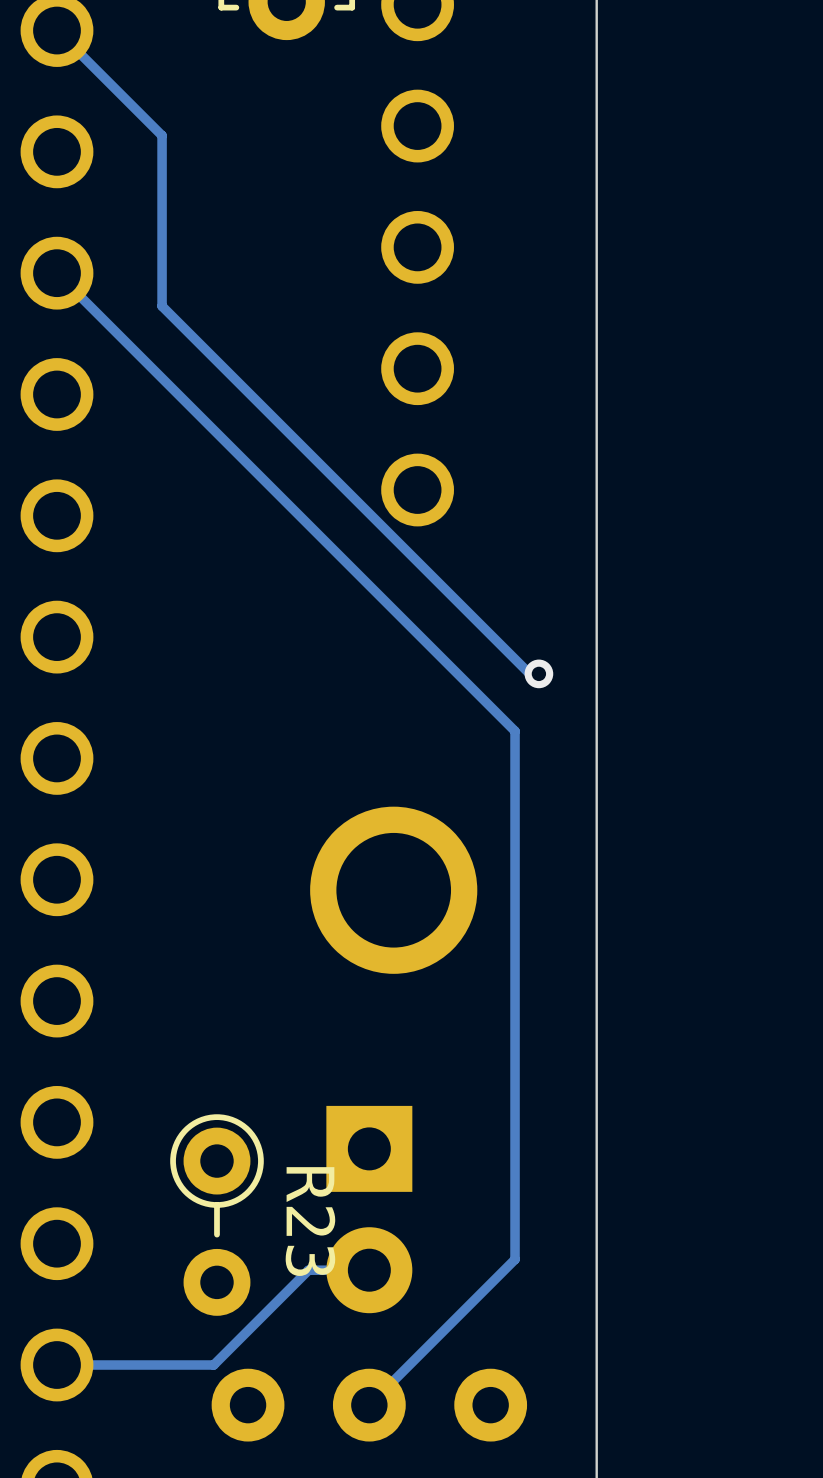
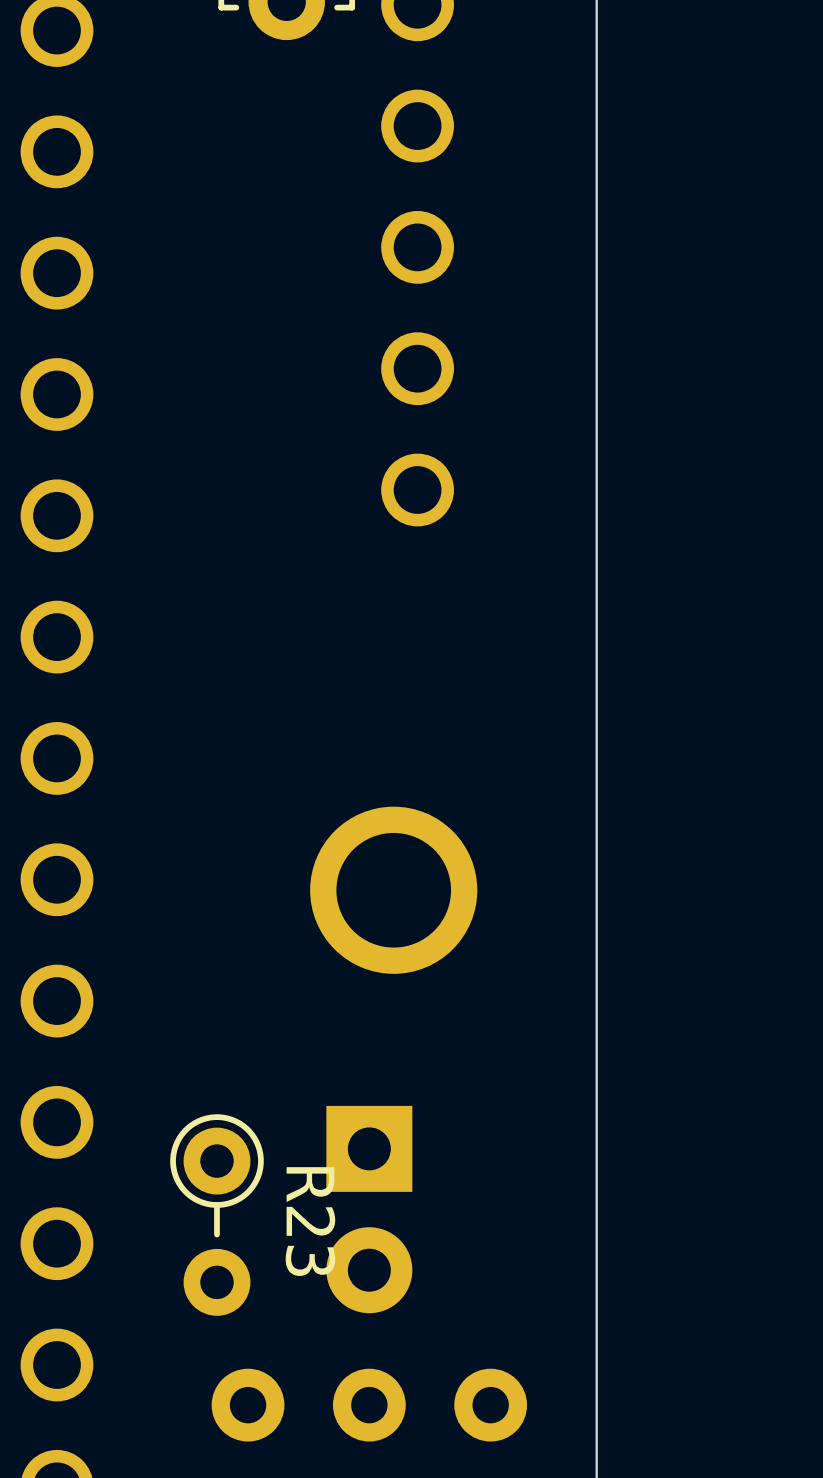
track: (56, 30) (162, 135) (162, 306) (529, 673) (538, 673) -> none
track: (56, 273) (515, 731) (515, 1259) (369, 1405) -> none
via: (538, 673) -> none
track: (369, 1270) (308, 1270) (213, 1365) (56, 1365) -> none

